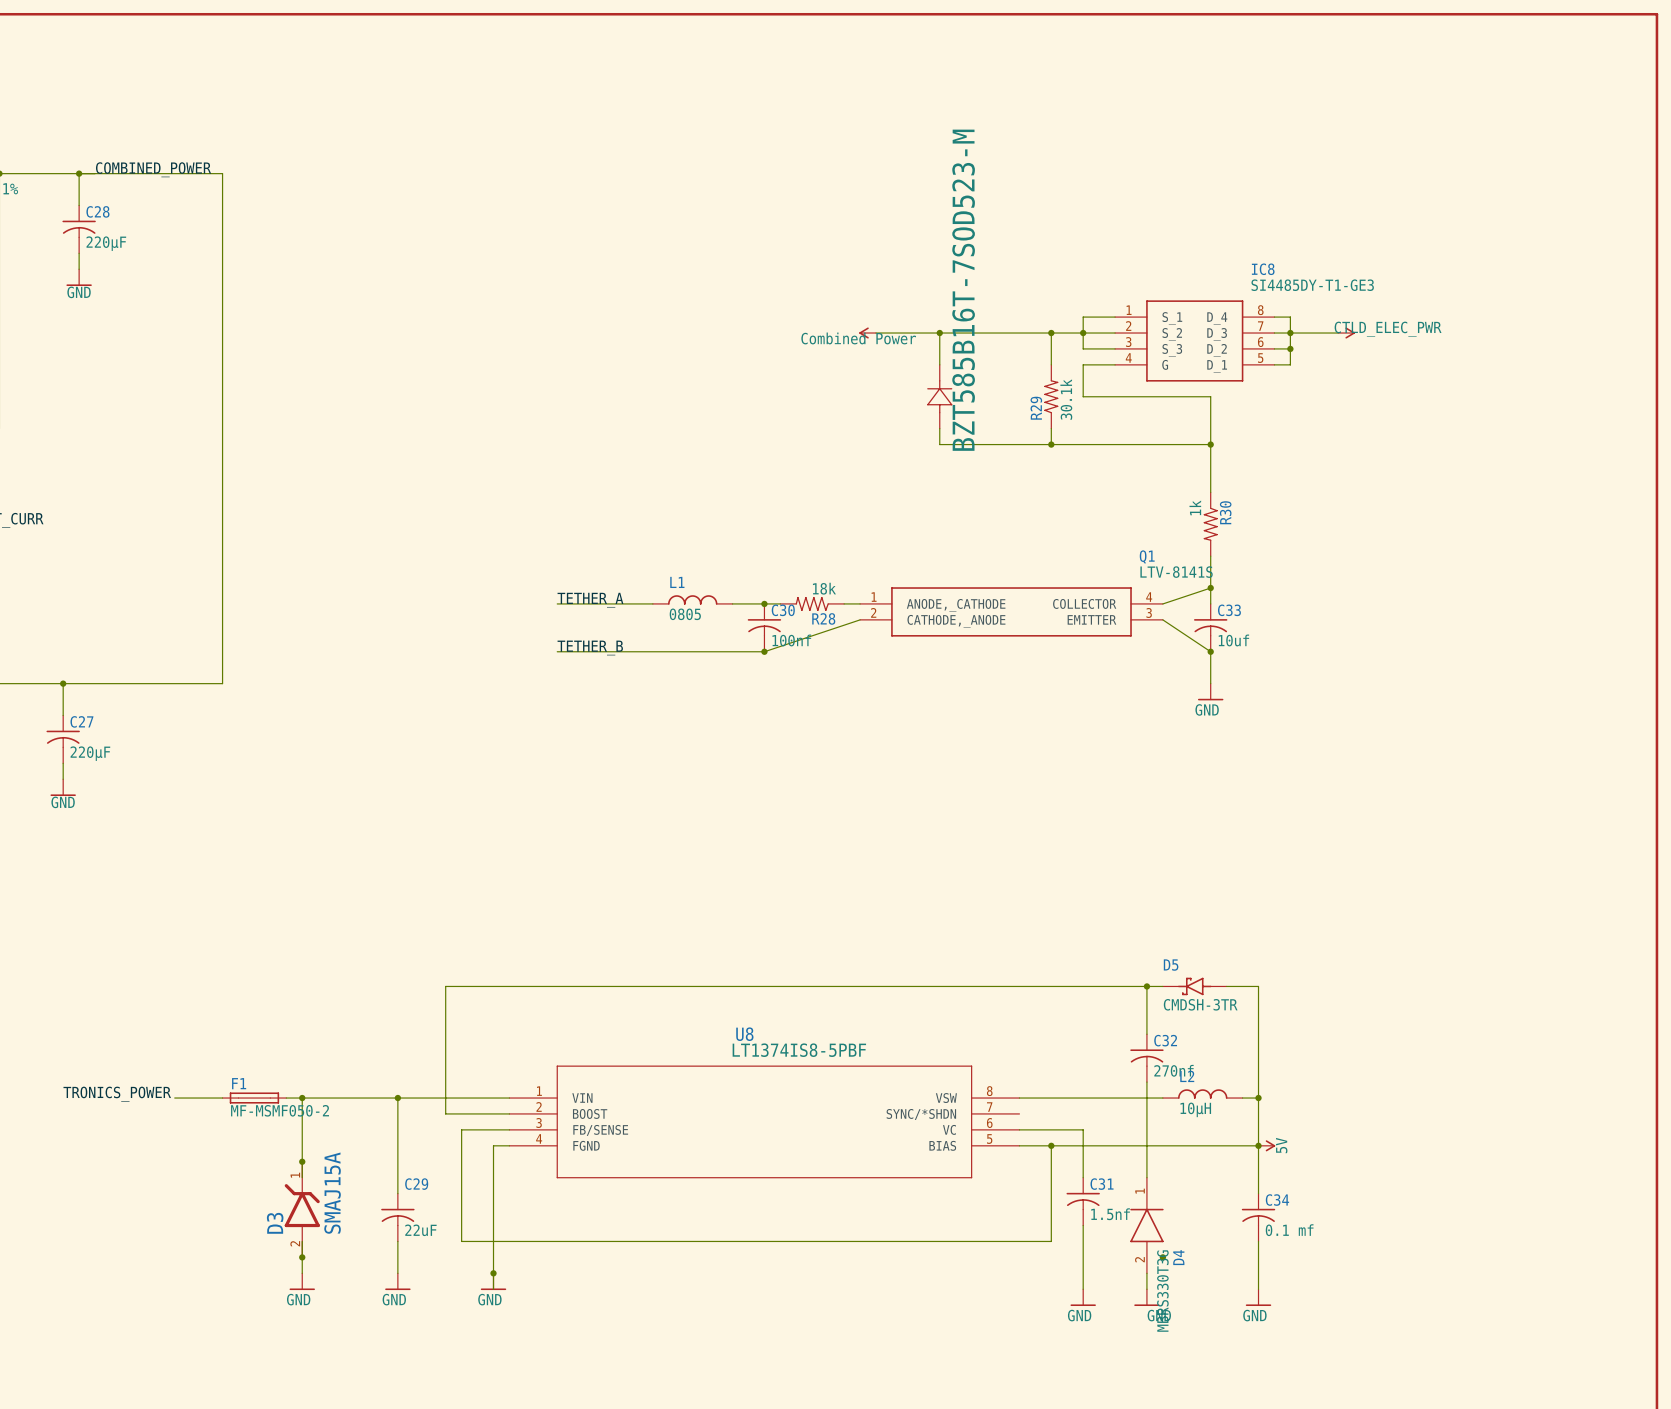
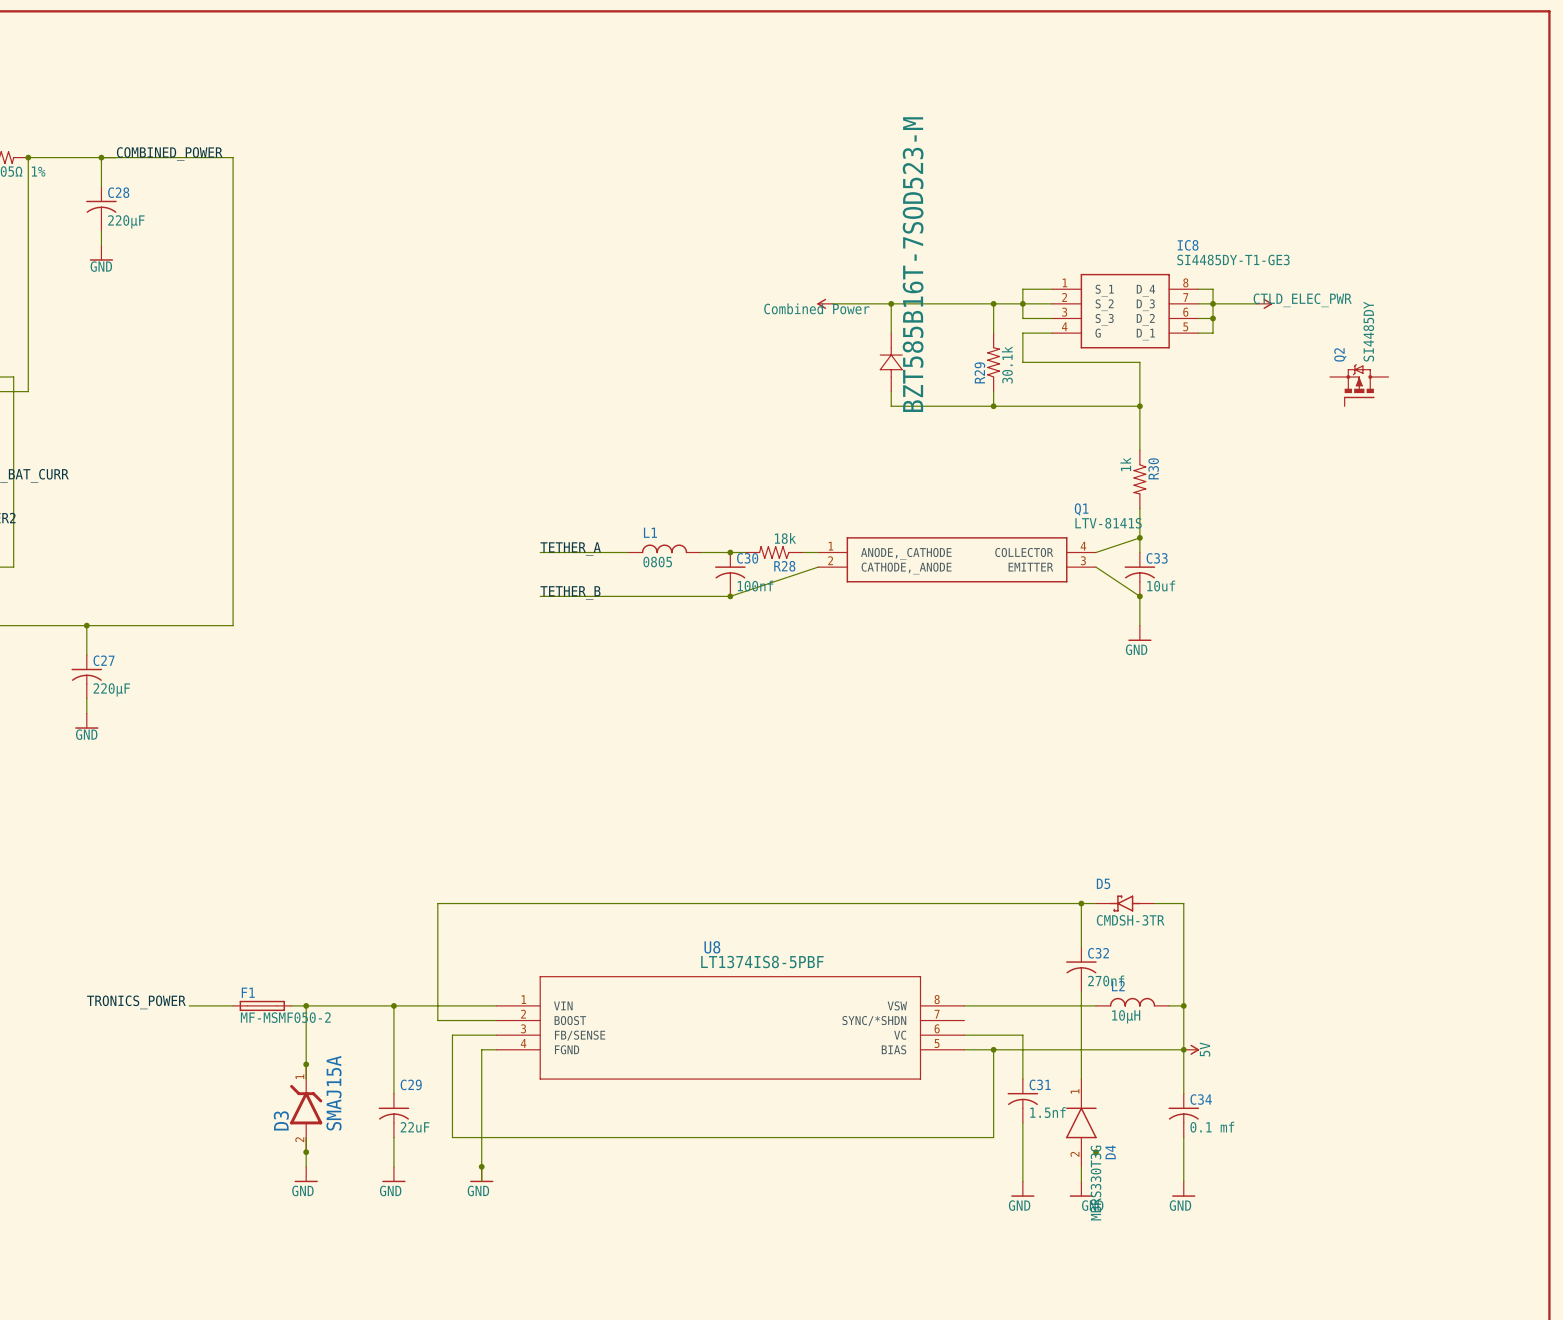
Q2: none -> SI4485DY (1359, 385)

